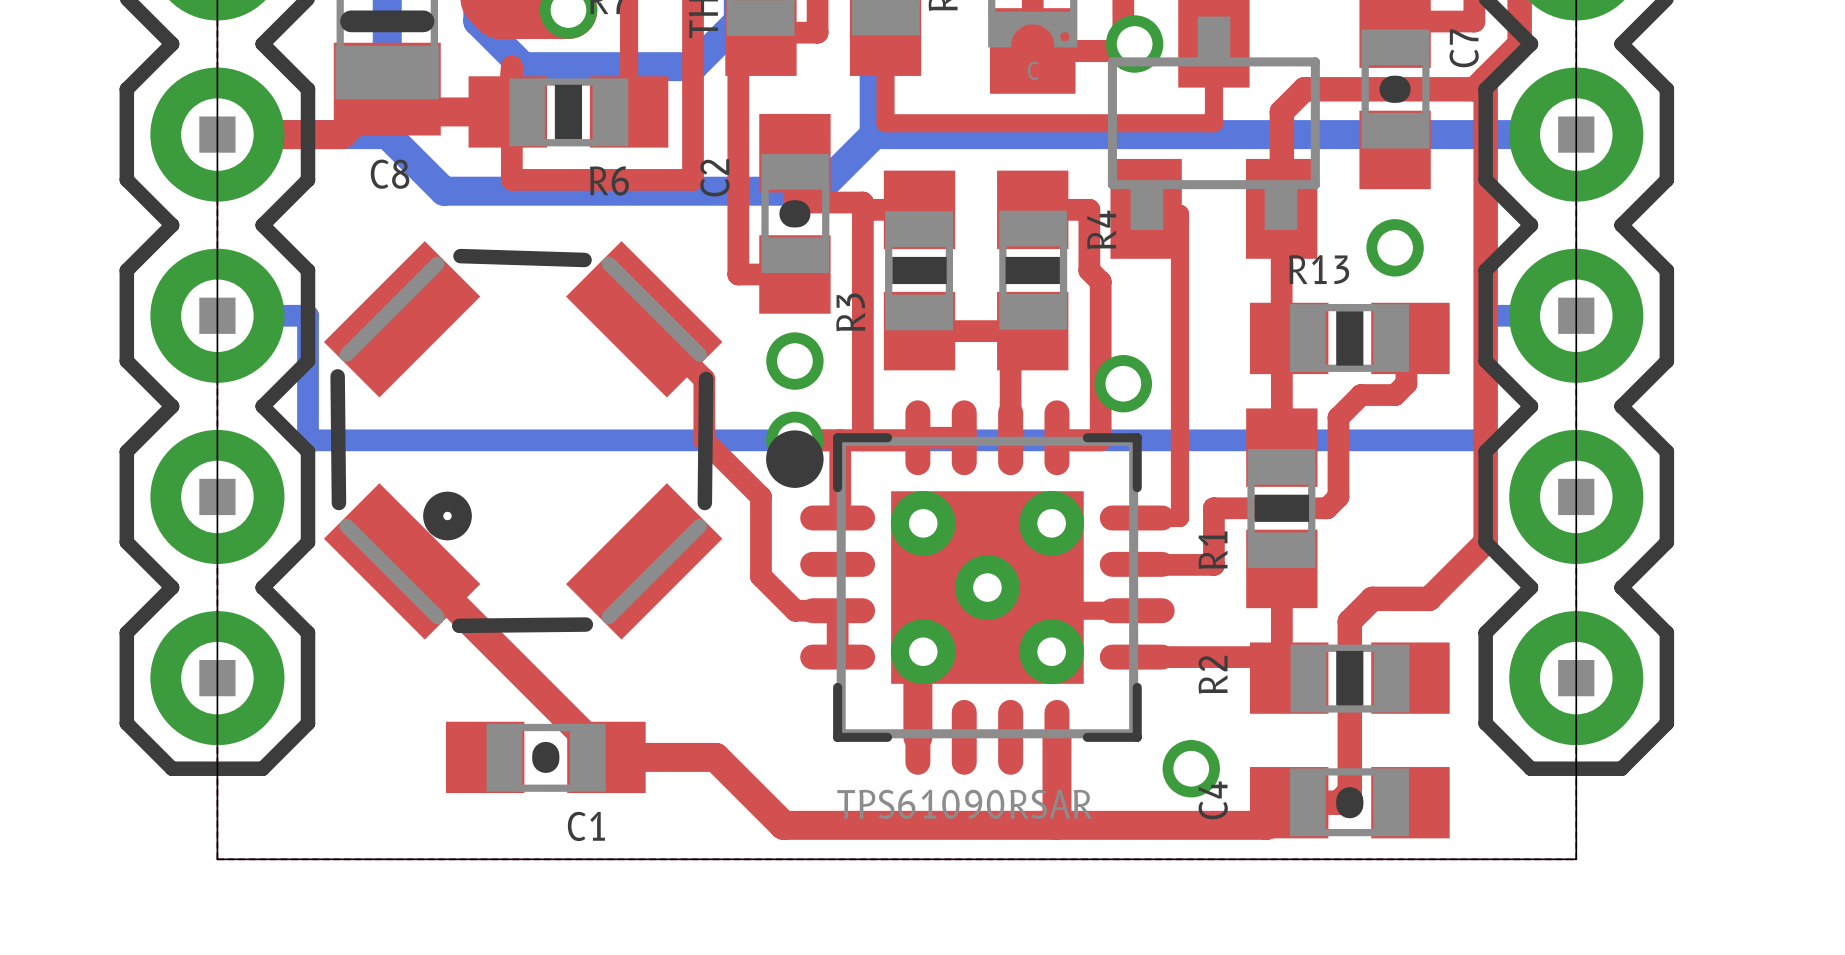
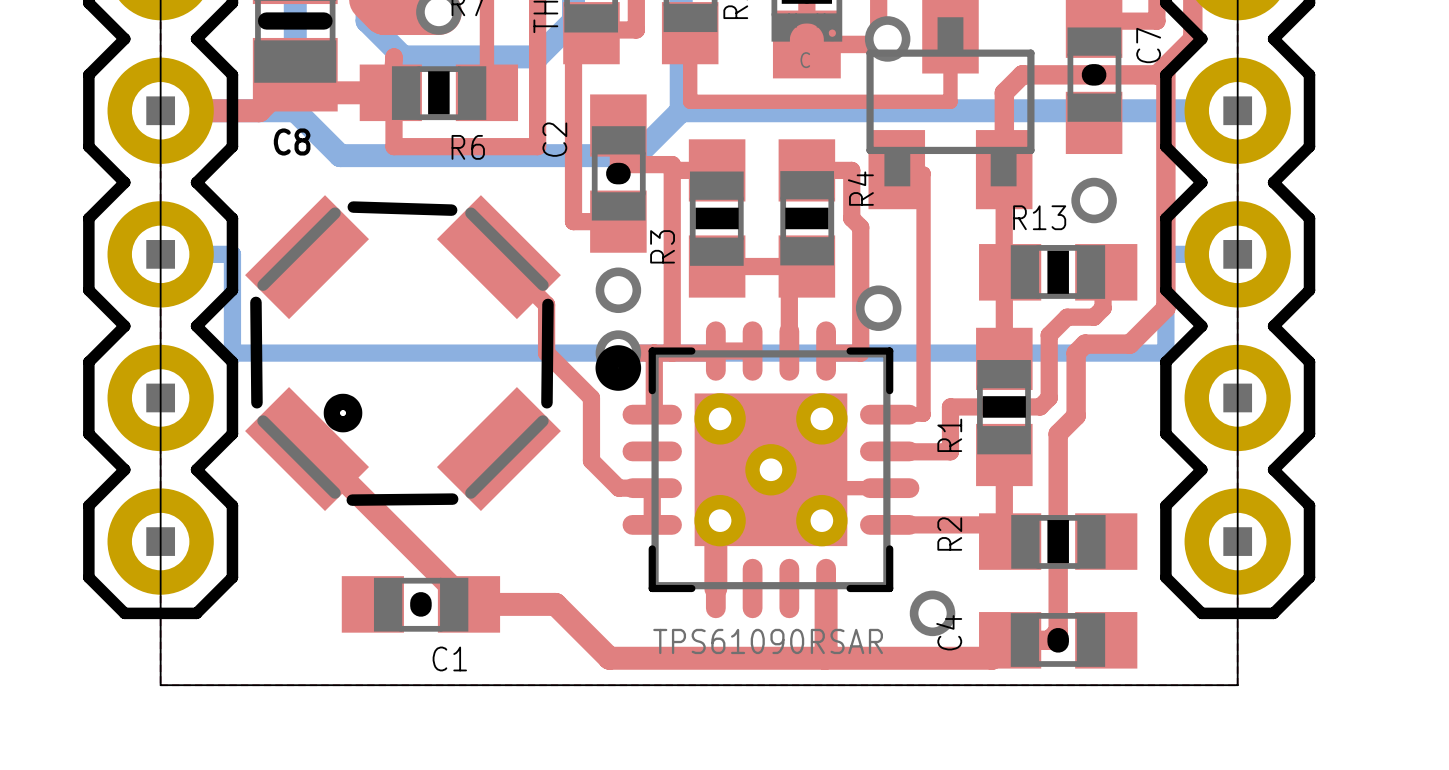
top track: (1485, 383) (1485, 542) (1429, 598) (1372, 598) (1349, 621) -> (1165, 308) (1129, 344) (1085, 344) (1076, 353) (1076, 415) (1058, 433) (1058, 496)

